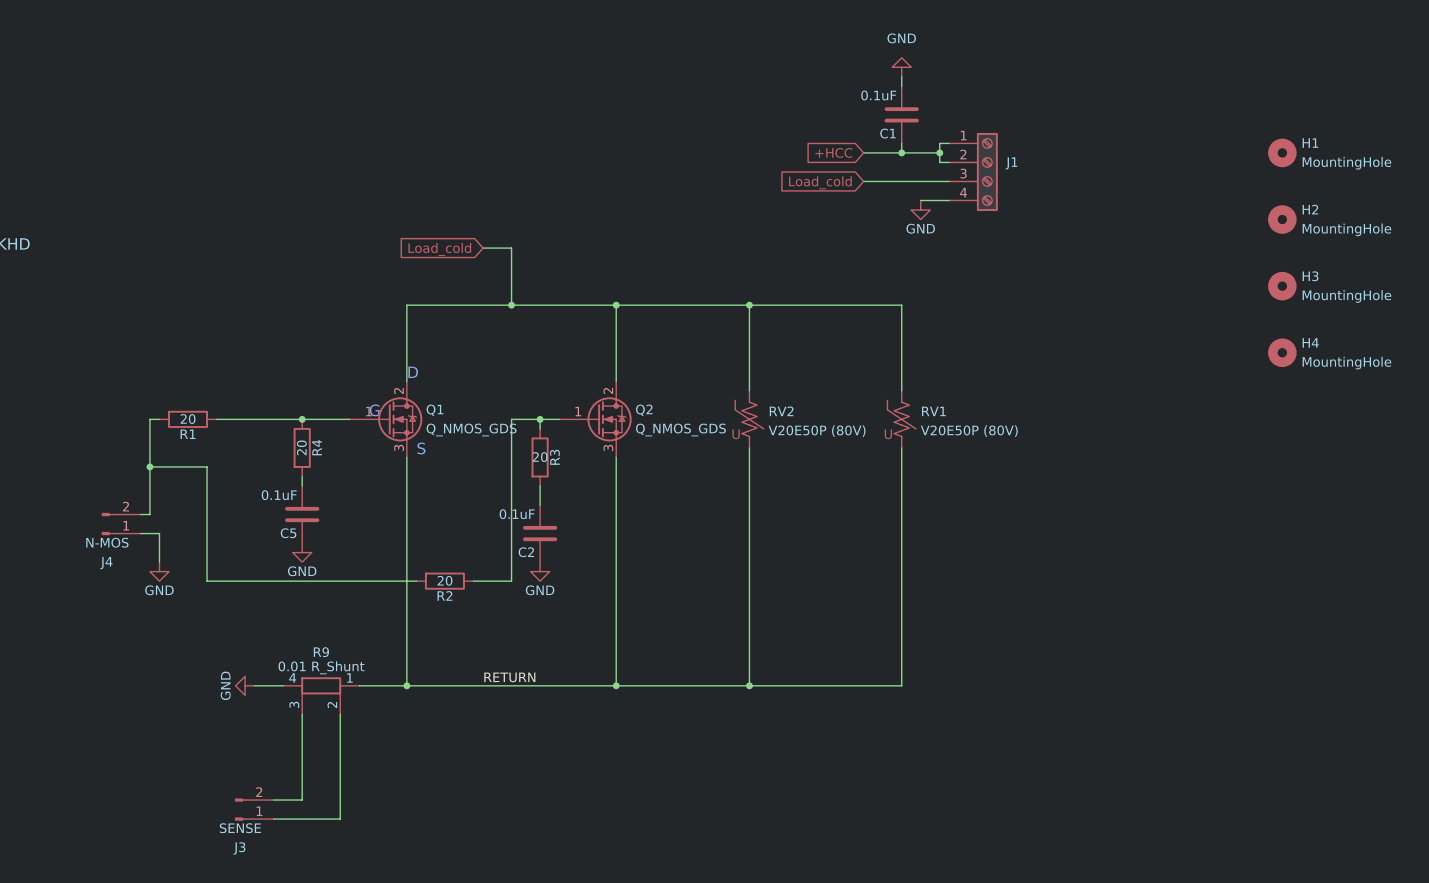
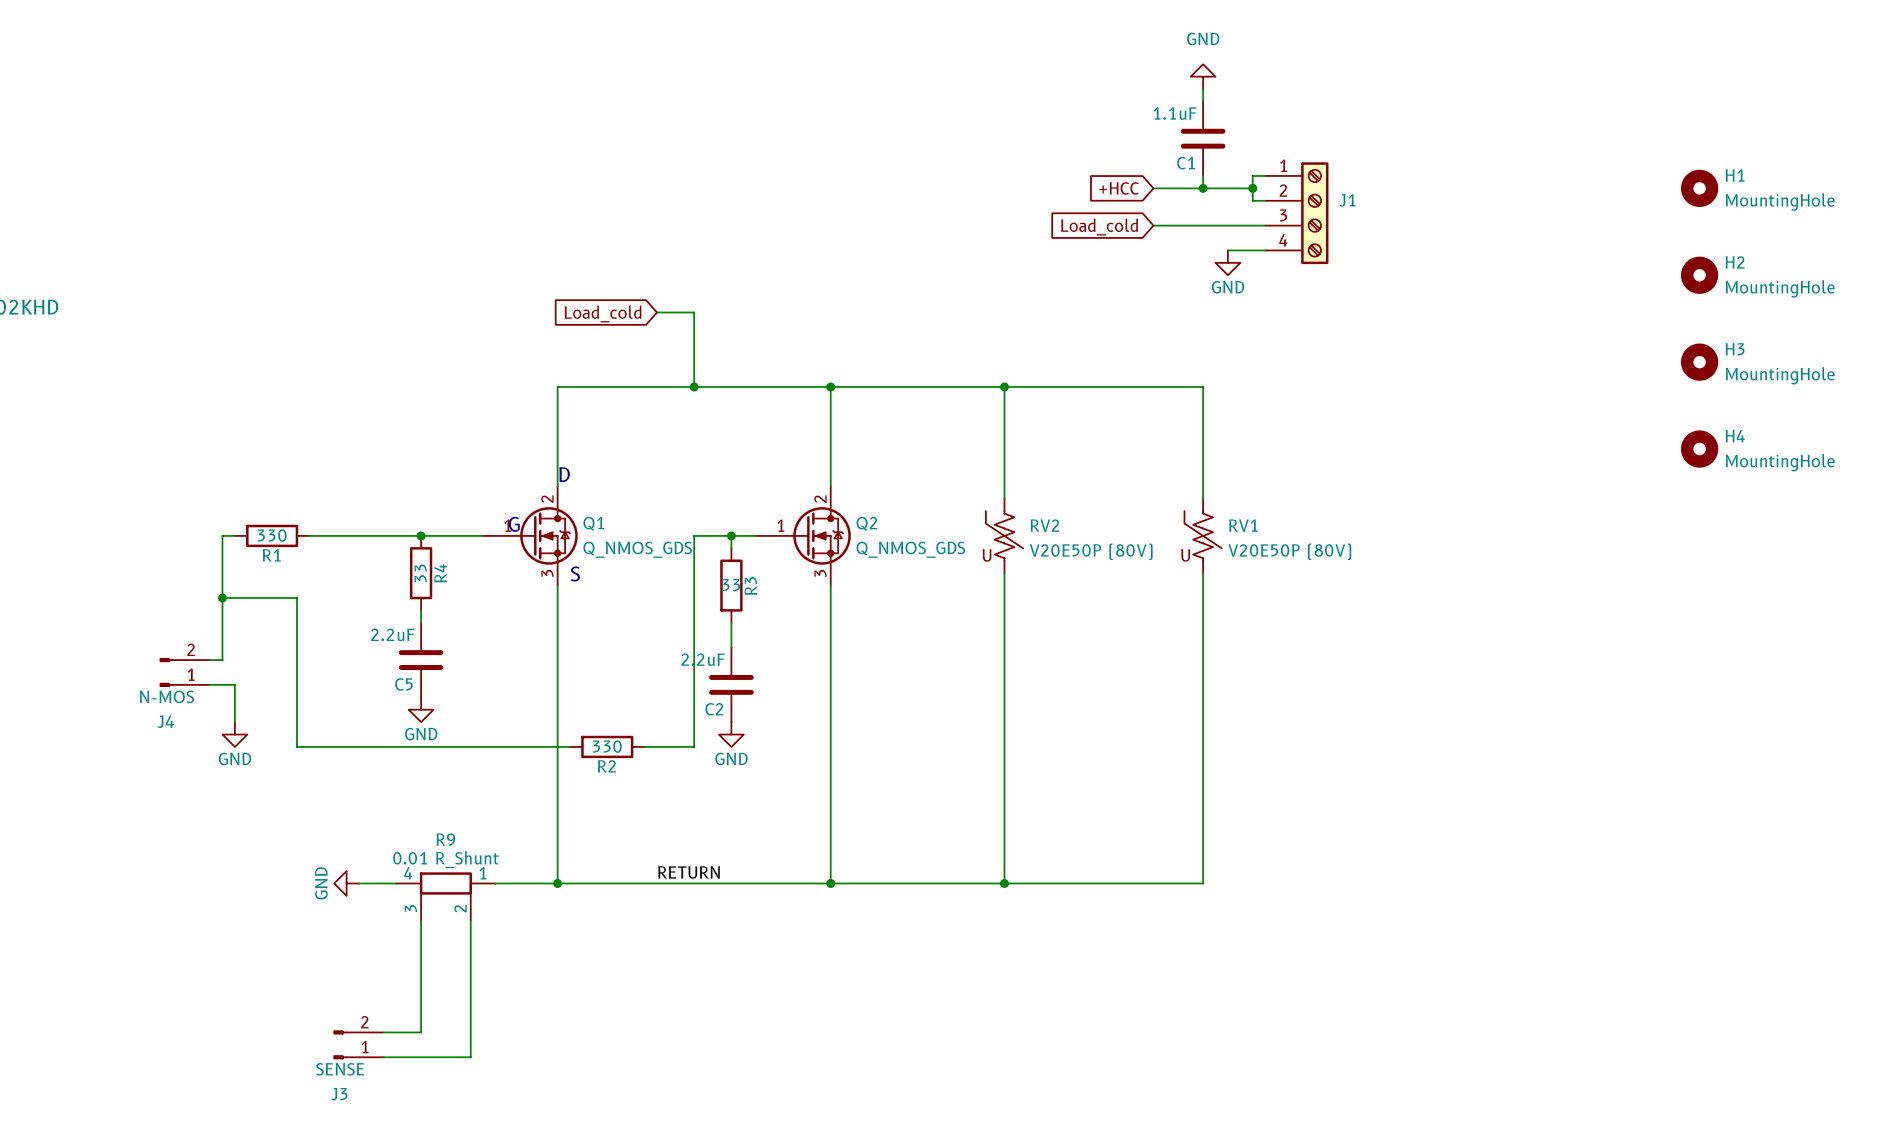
C1 value: 0.1uF (878, 95) -> 1.1uF (1175, 113)
R1 value: 20 (188, 419) -> 330 (272, 535)
R4 value: 20 (301, 447) -> 33 (420, 573)
R3 value: 20 (540, 457) -> 33 (731, 585)
C5 value: 0.1uF (279, 495) -> 2.2uF (392, 634)
C2 value: 0.1uF (517, 514) -> 2.2uF (703, 659)
R2 value: 20 (444, 580) -> 330 (607, 746)

